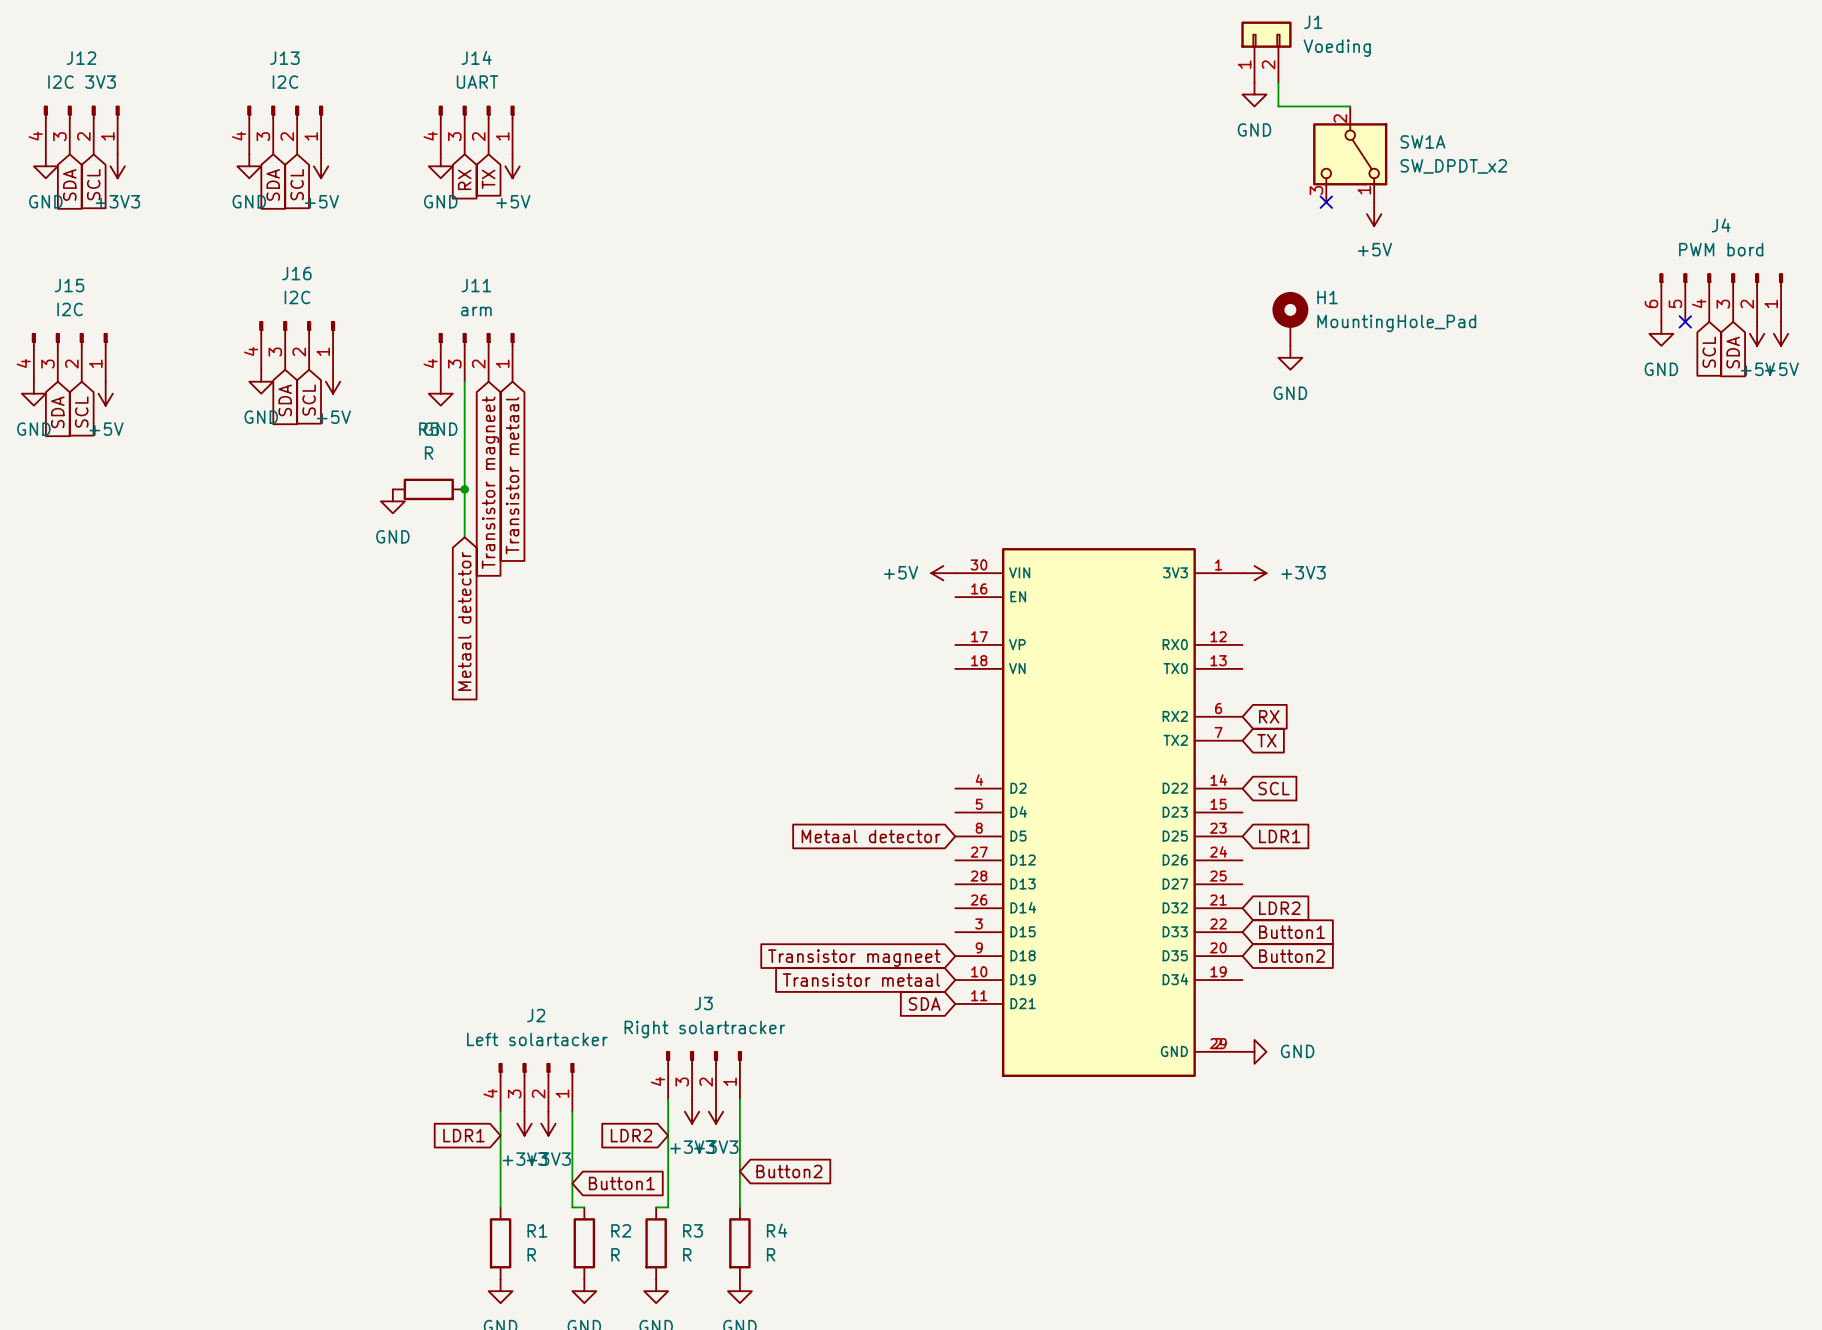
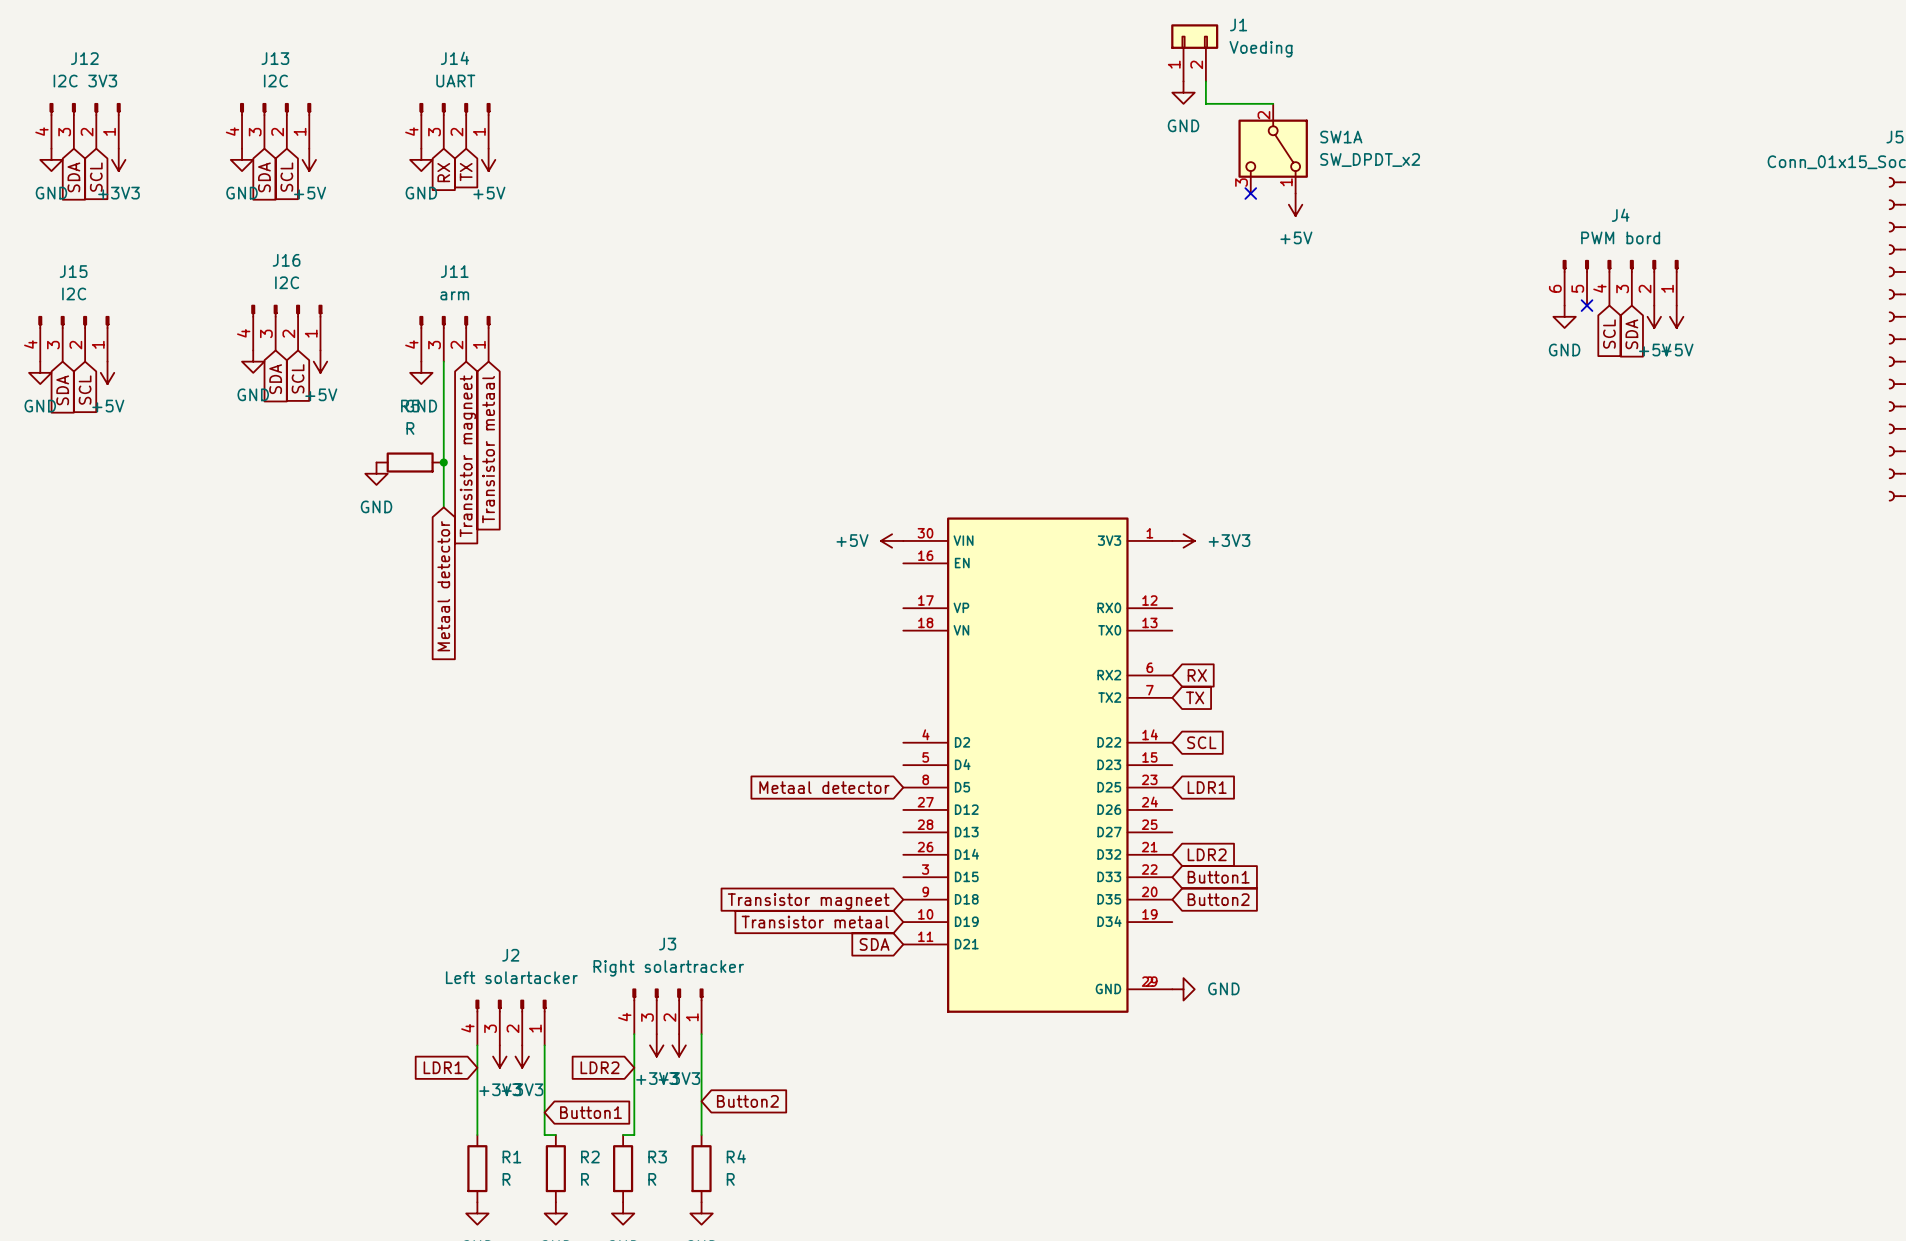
H1: MountingHole_Pad (1290, 318) -> none
power symbol: GND (1290, 357) -> none

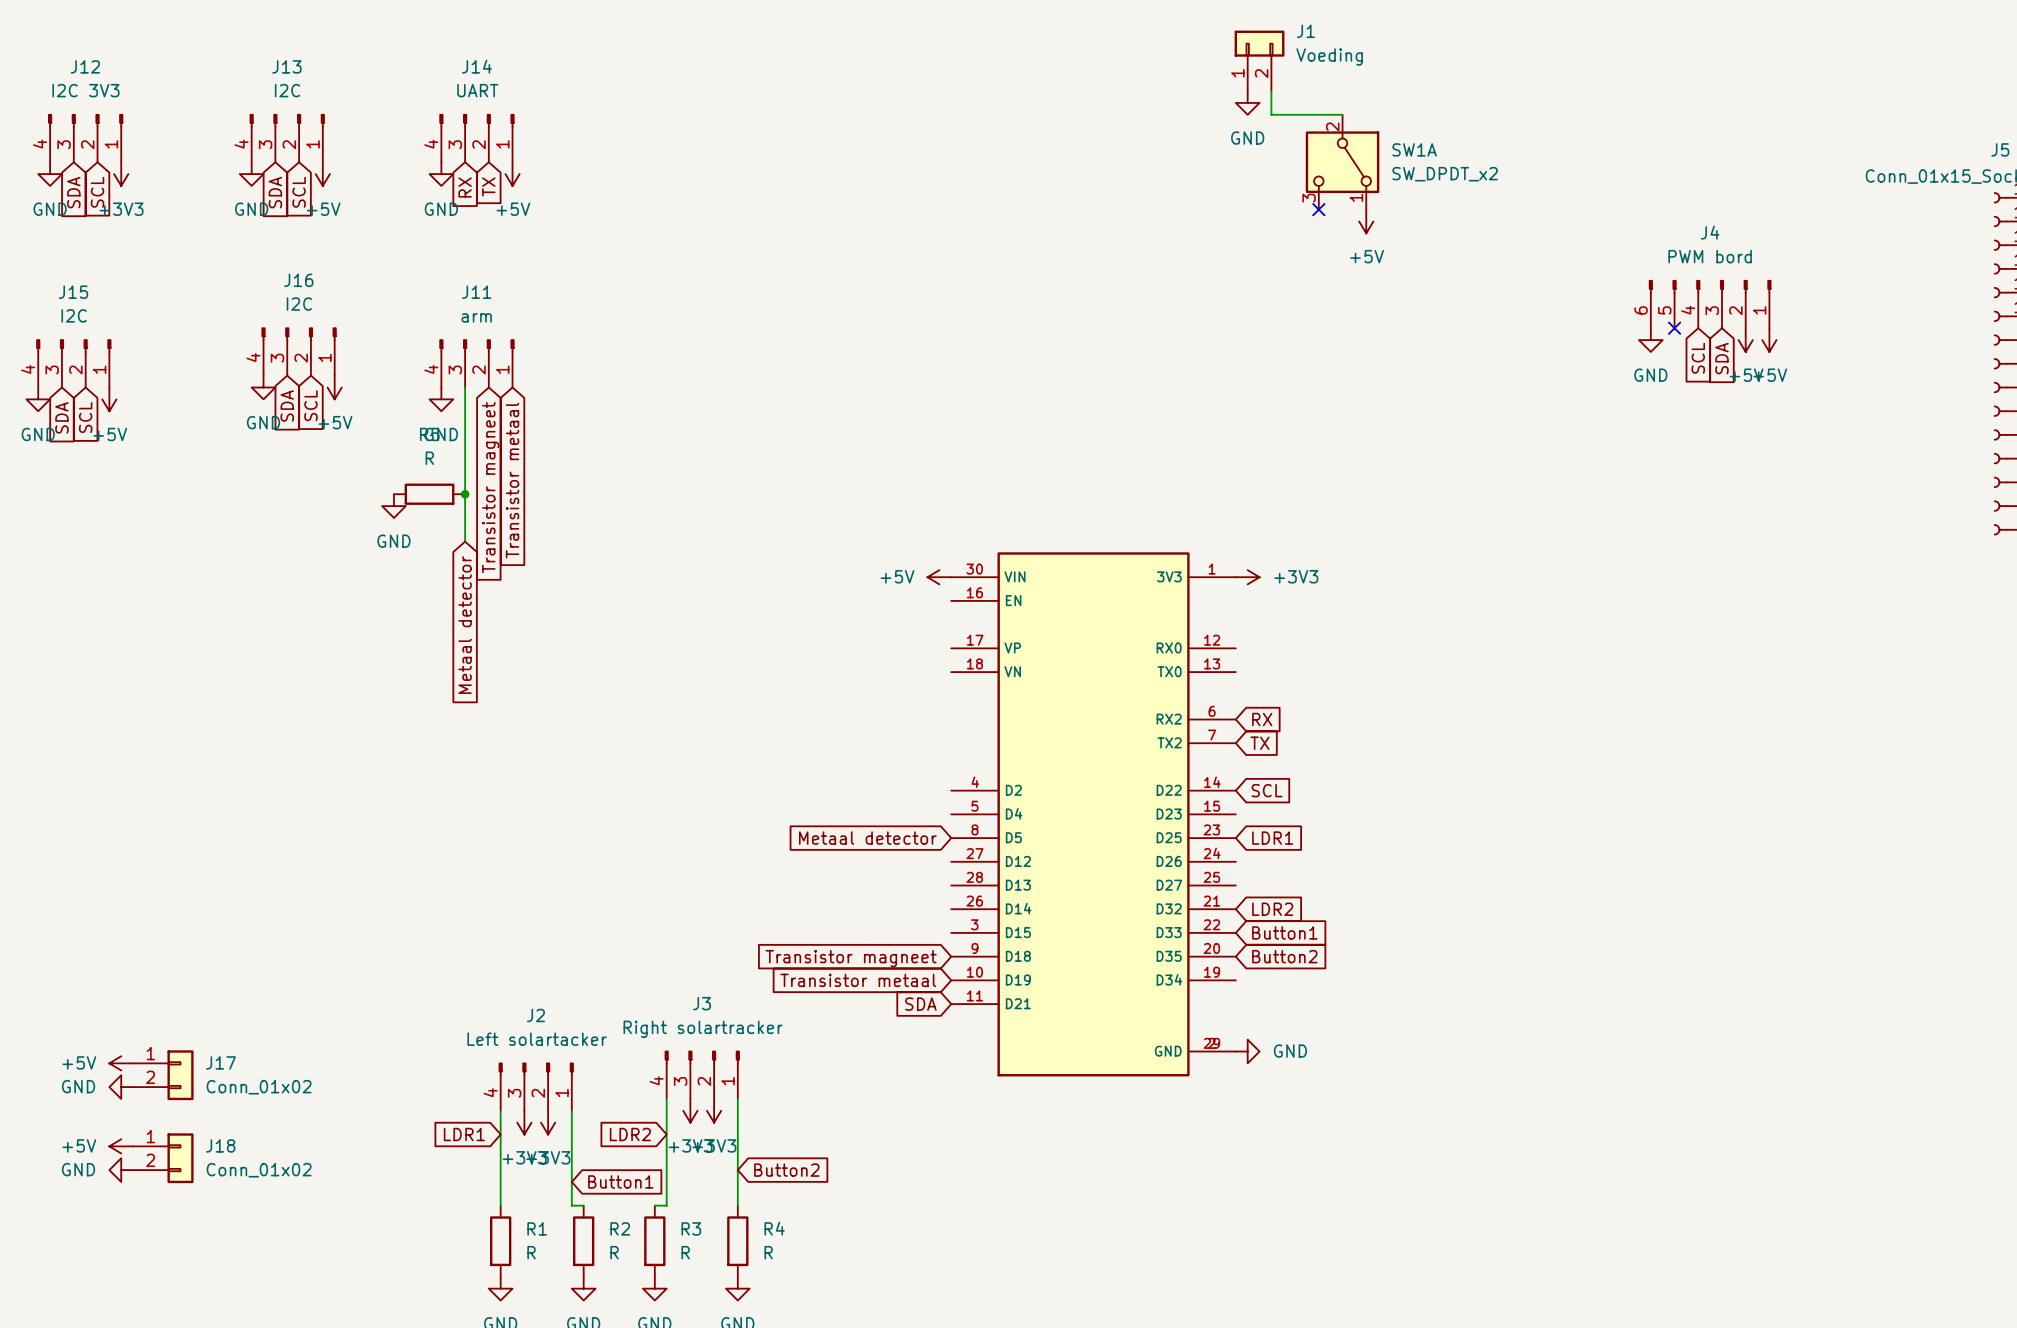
power symbol: none -> +5V (121, 1063)
J17: none -> Conn_01x02 (163, 1075)
power symbol: none -> GND (121, 1087)
power symbol: none -> +5V (121, 1146)
J18: none -> Conn_01x02 (163, 1158)
power symbol: none -> GND (121, 1170)

